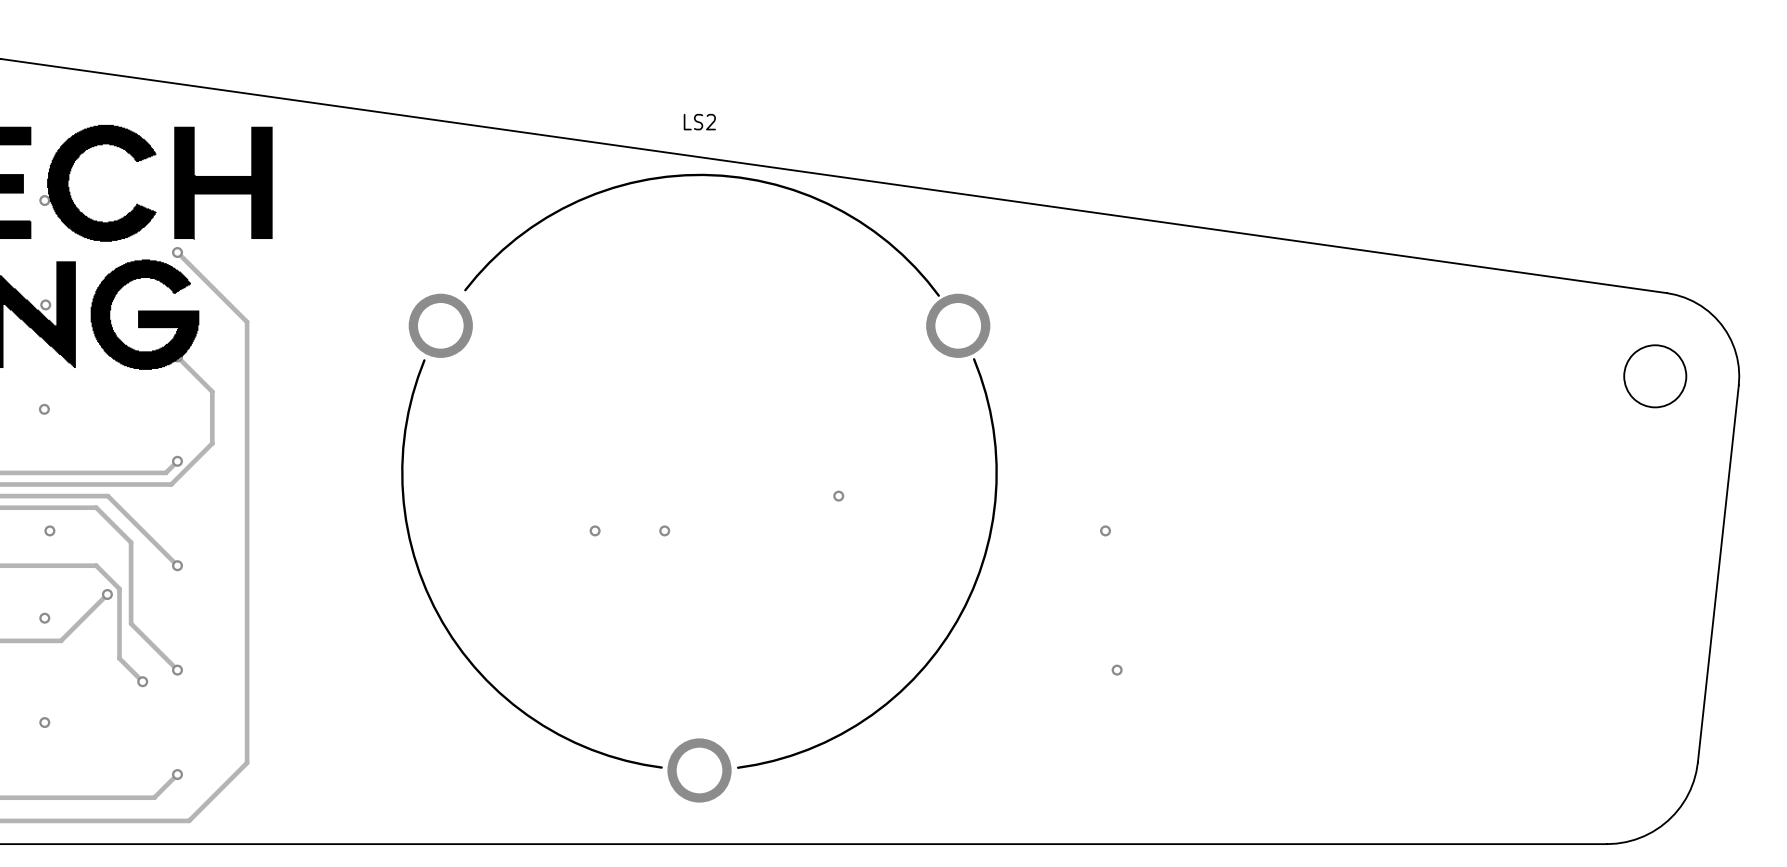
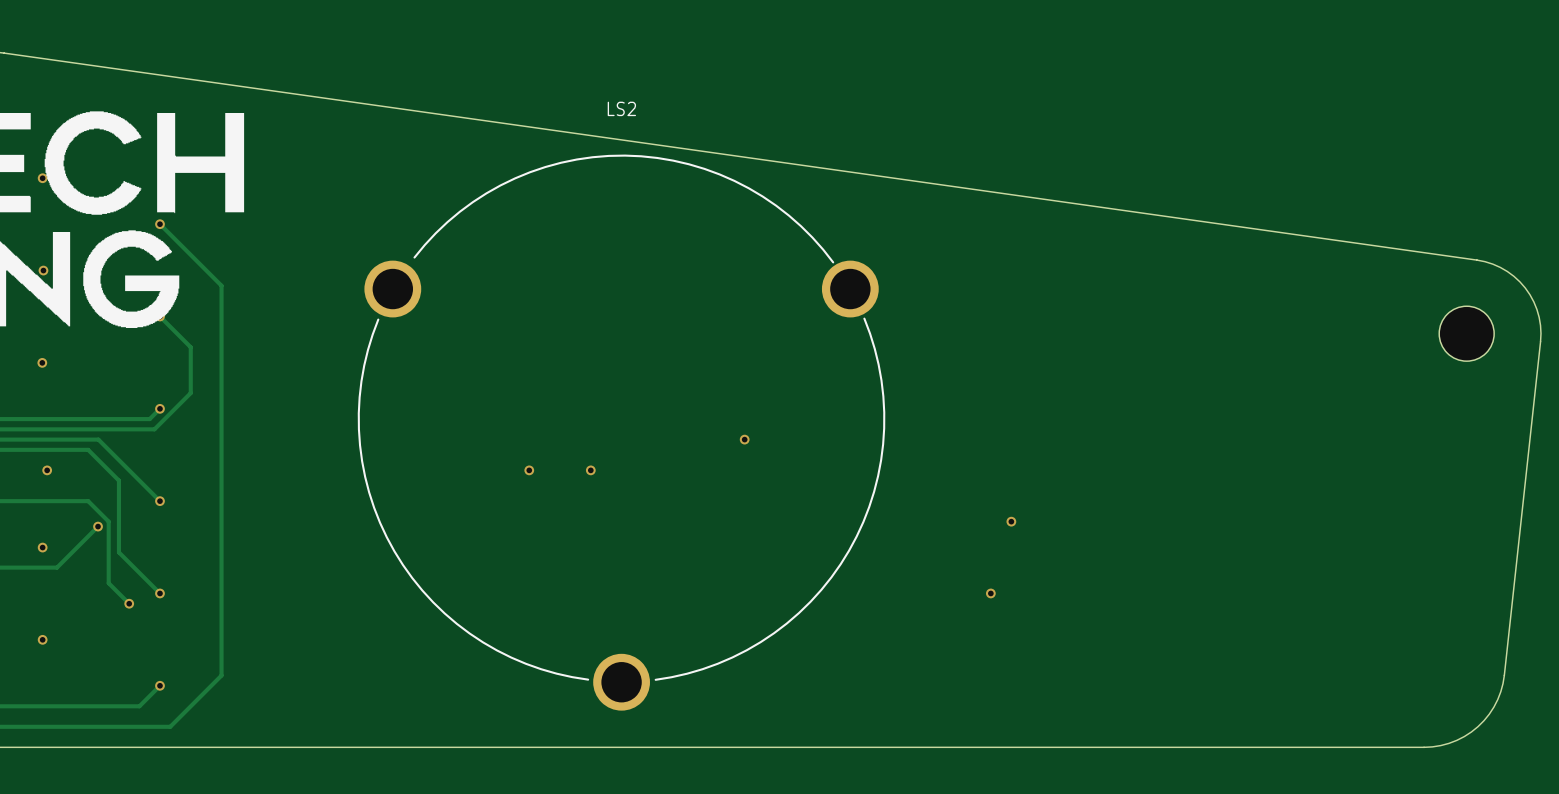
via position: (1105, 530) -> (1011, 521)

